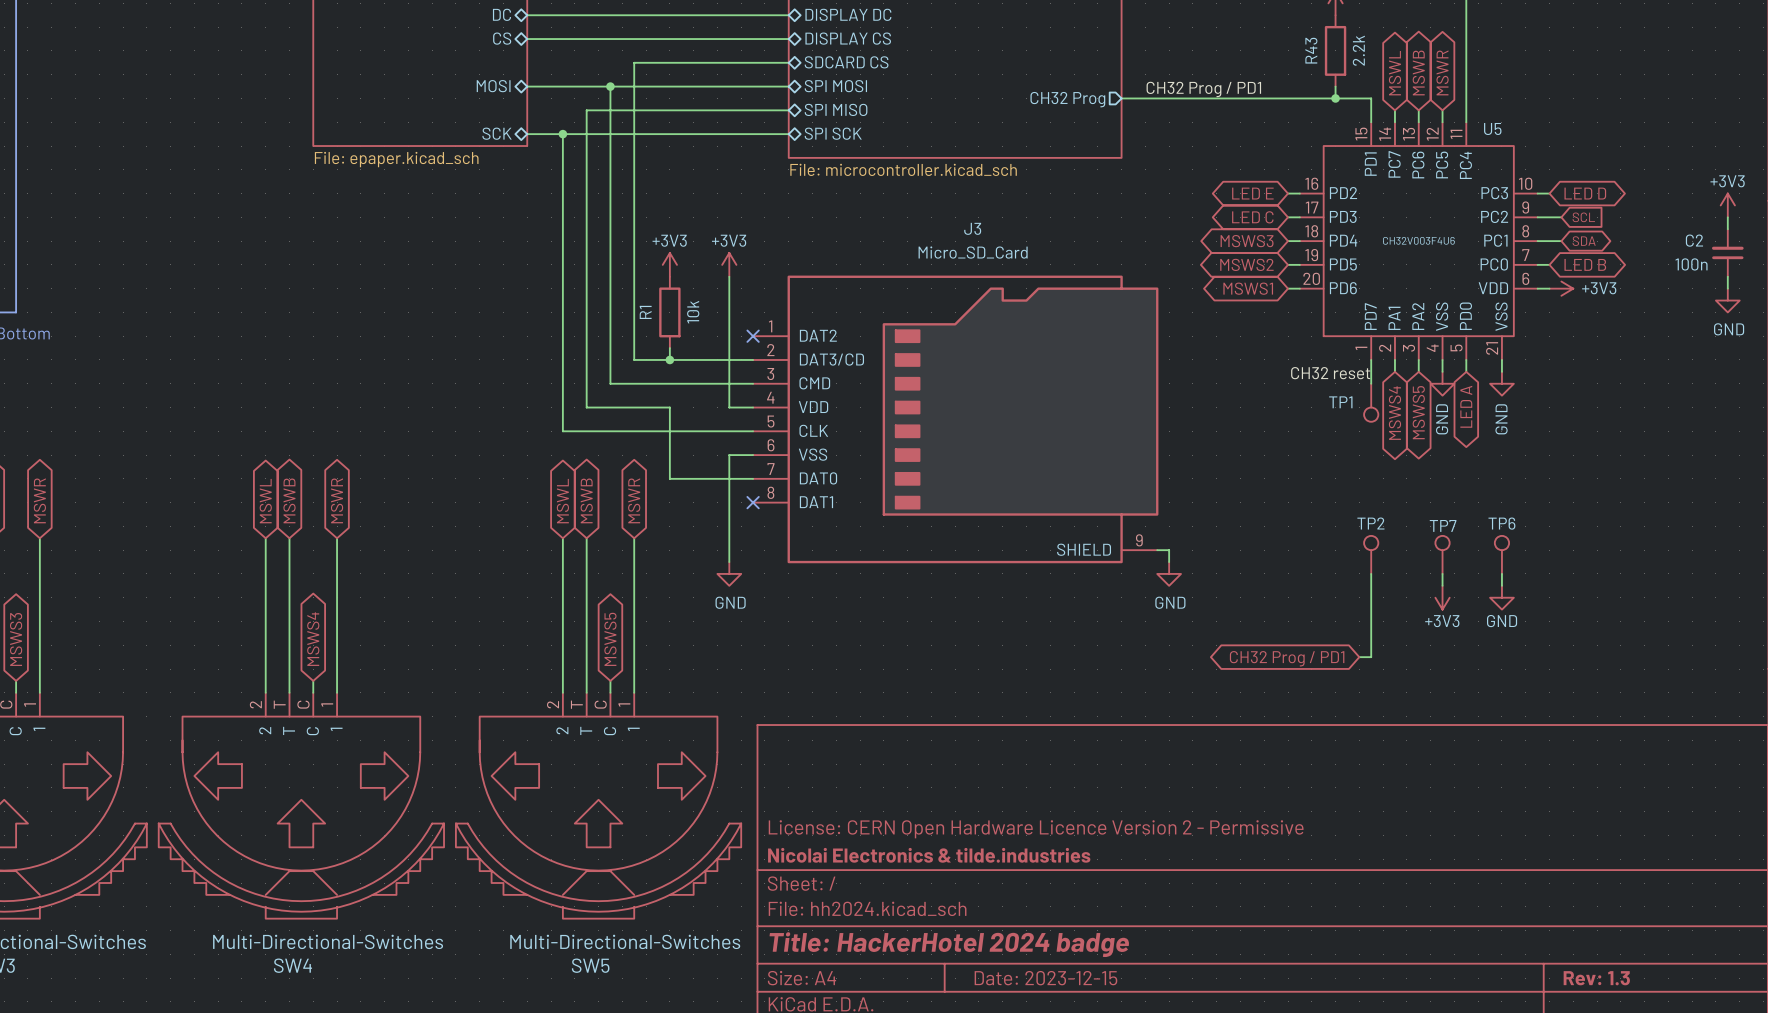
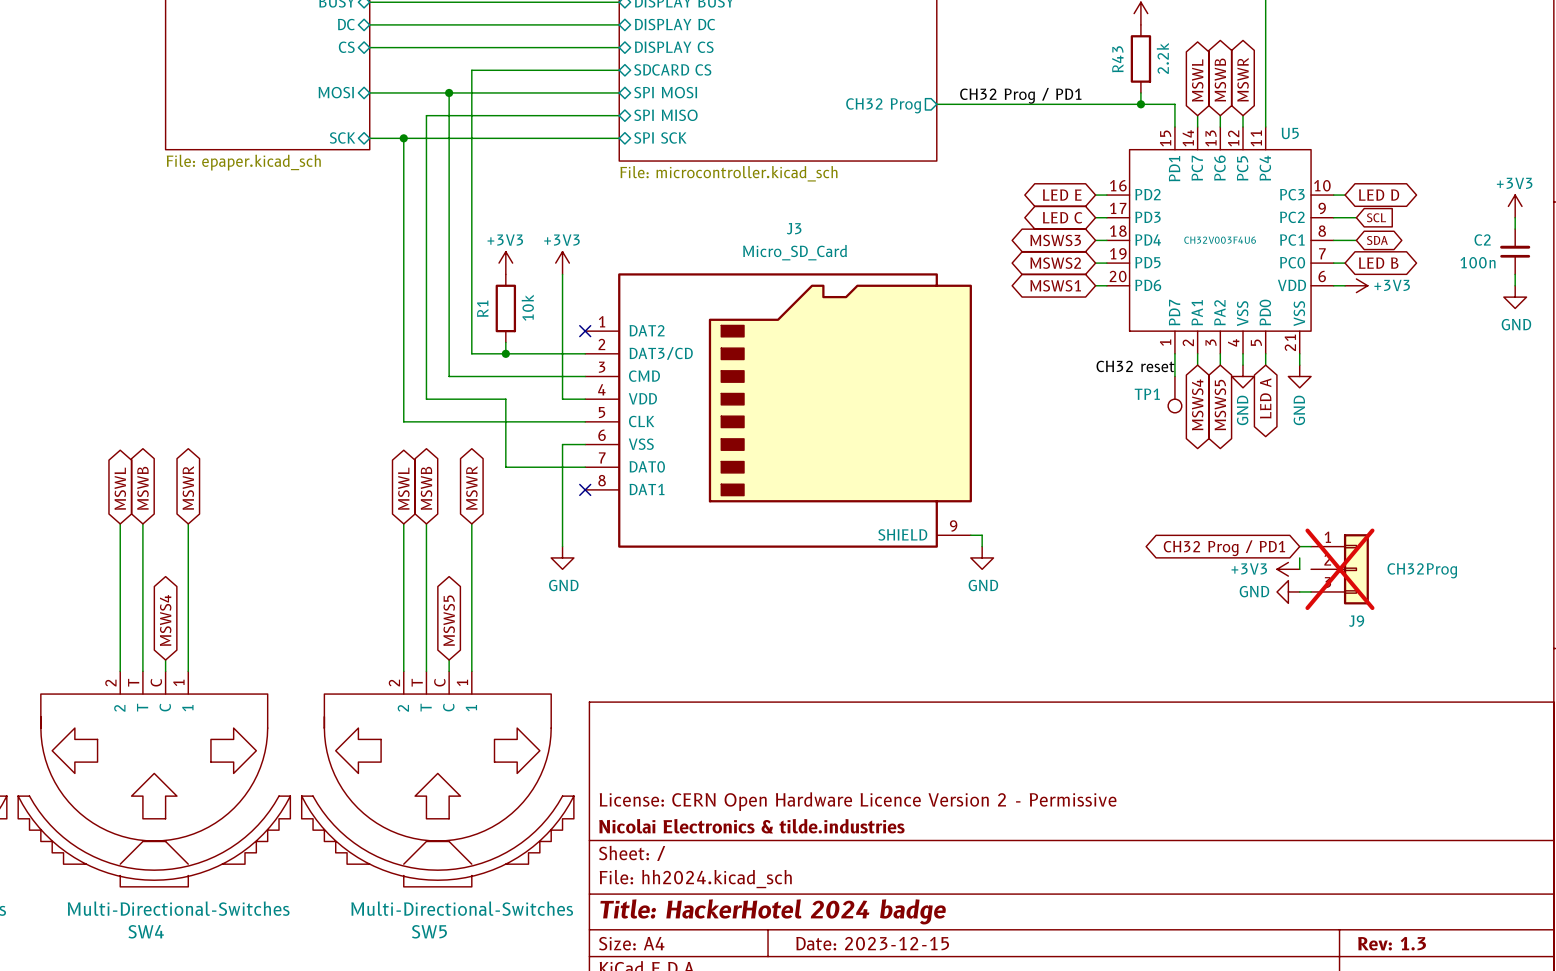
TP2: (1371, 554) -> none
TP7: (1442, 554) -> none
TP6: (1501, 554) -> none
wire: none -> (1299, 546) (1311, 546)
wire: (1371, 573) (1371, 657) (1359, 657) -> none
wire: (1442, 573) (1442, 585) -> none
J9: none -> CH32Prog (1339, 569)
power symbol rotation: 0° (1442, 597) -> 90° clockwise (1288, 569)
power symbol position: +3V3 (1442, 597) -> +3V3 (1288, 569)
power symbol rotation: 0° (1501, 597) -> 90° clockwise (1288, 591)
power symbol position: GND (1501, 597) -> GND (1288, 591)
wire: none -> (1299, 591) (1311, 591)
global label position: CH32 Prog / PD1 (1287, 658) -> CH32 Prog / PD1 (1224, 548)

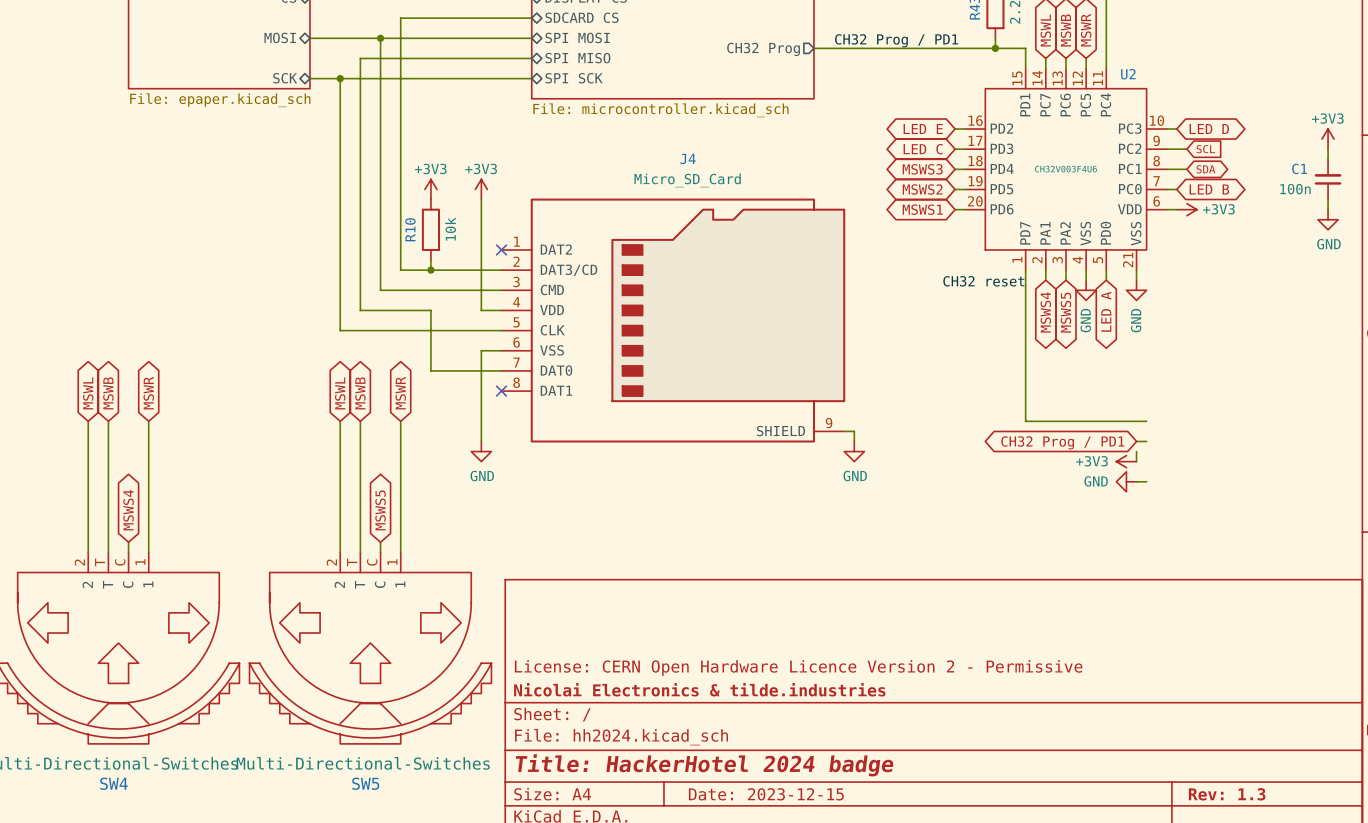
U5 name: U5 (1290, 133) -> U2 (1128, 74)
J3 name: J3 (794, 228) -> J4 (688, 158)
C2 name: C2 (1482, 240) -> C1 (1299, 168)
R1 name: R1 (482, 308) -> R10 (410, 229)
wire: none -> (1025, 290) (1025, 421) (1146, 421)
TP1: (1174, 394) -> none
J9: CH32Prog (1339, 569) -> none

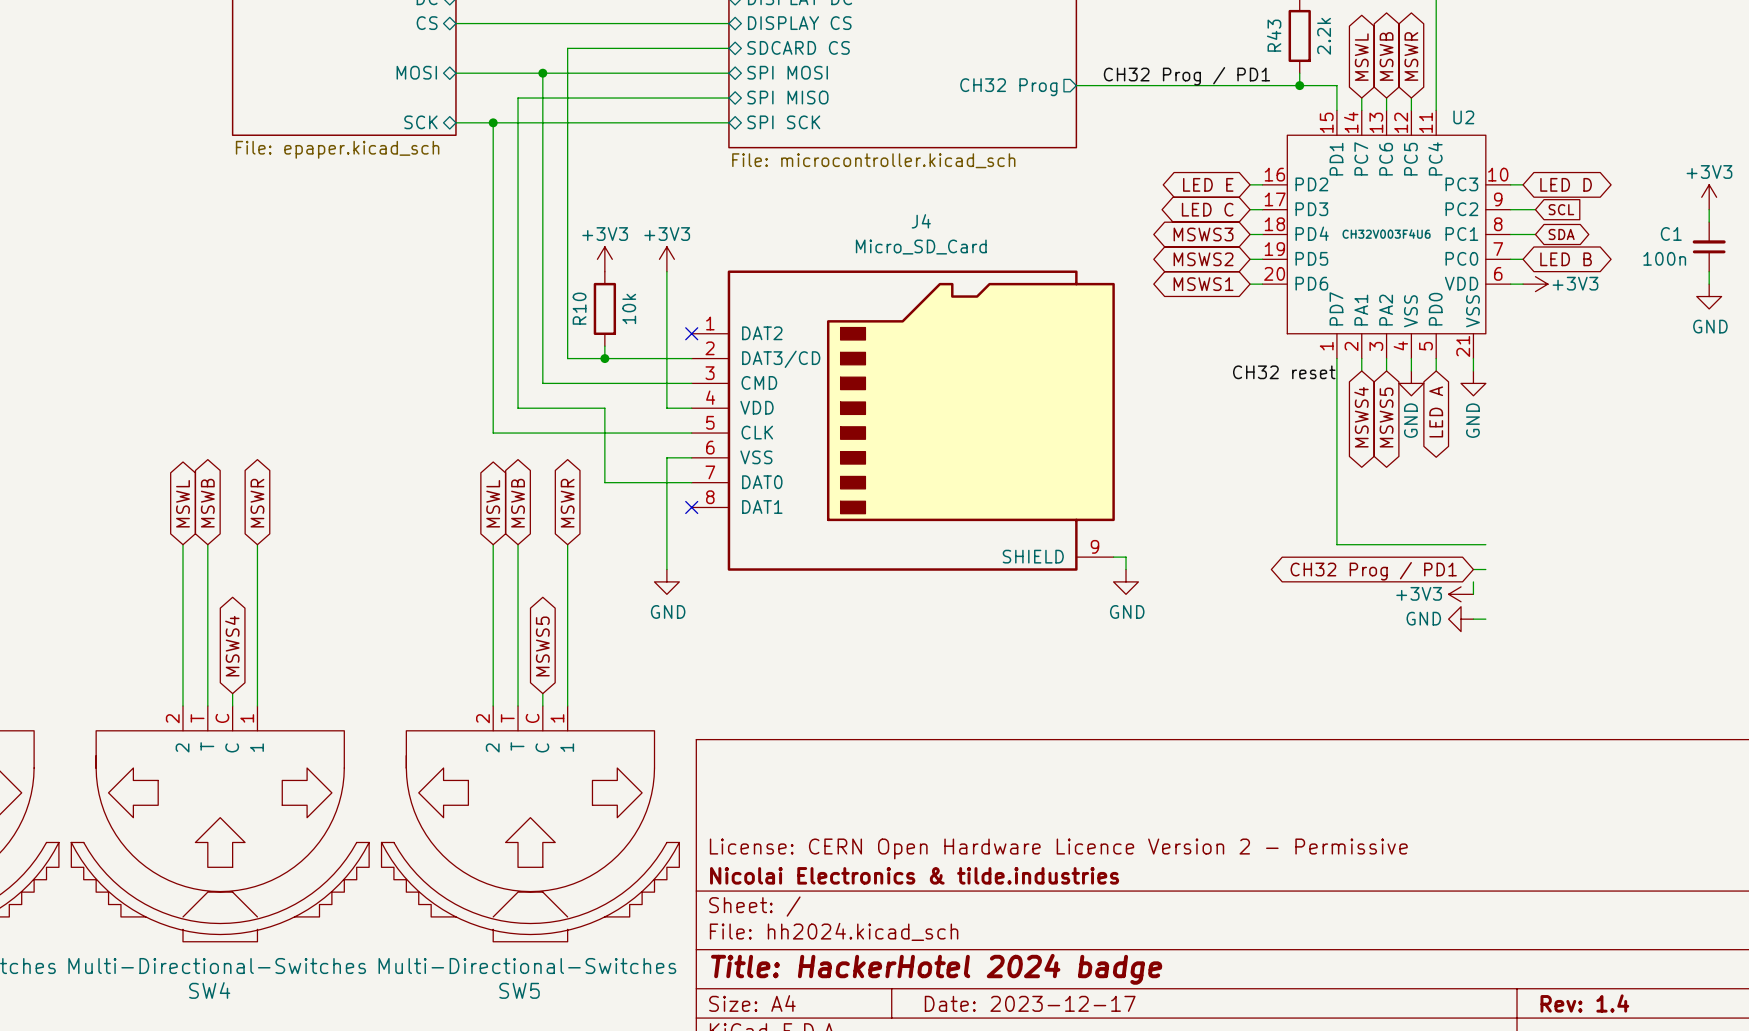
title block: Date: 2023-12-15 (766, 794) -> Date: 2023-12-17 (1030, 1003)
title block: Rev: 1.3 (1227, 794) -> Rev: 1.4 (1584, 1003)

